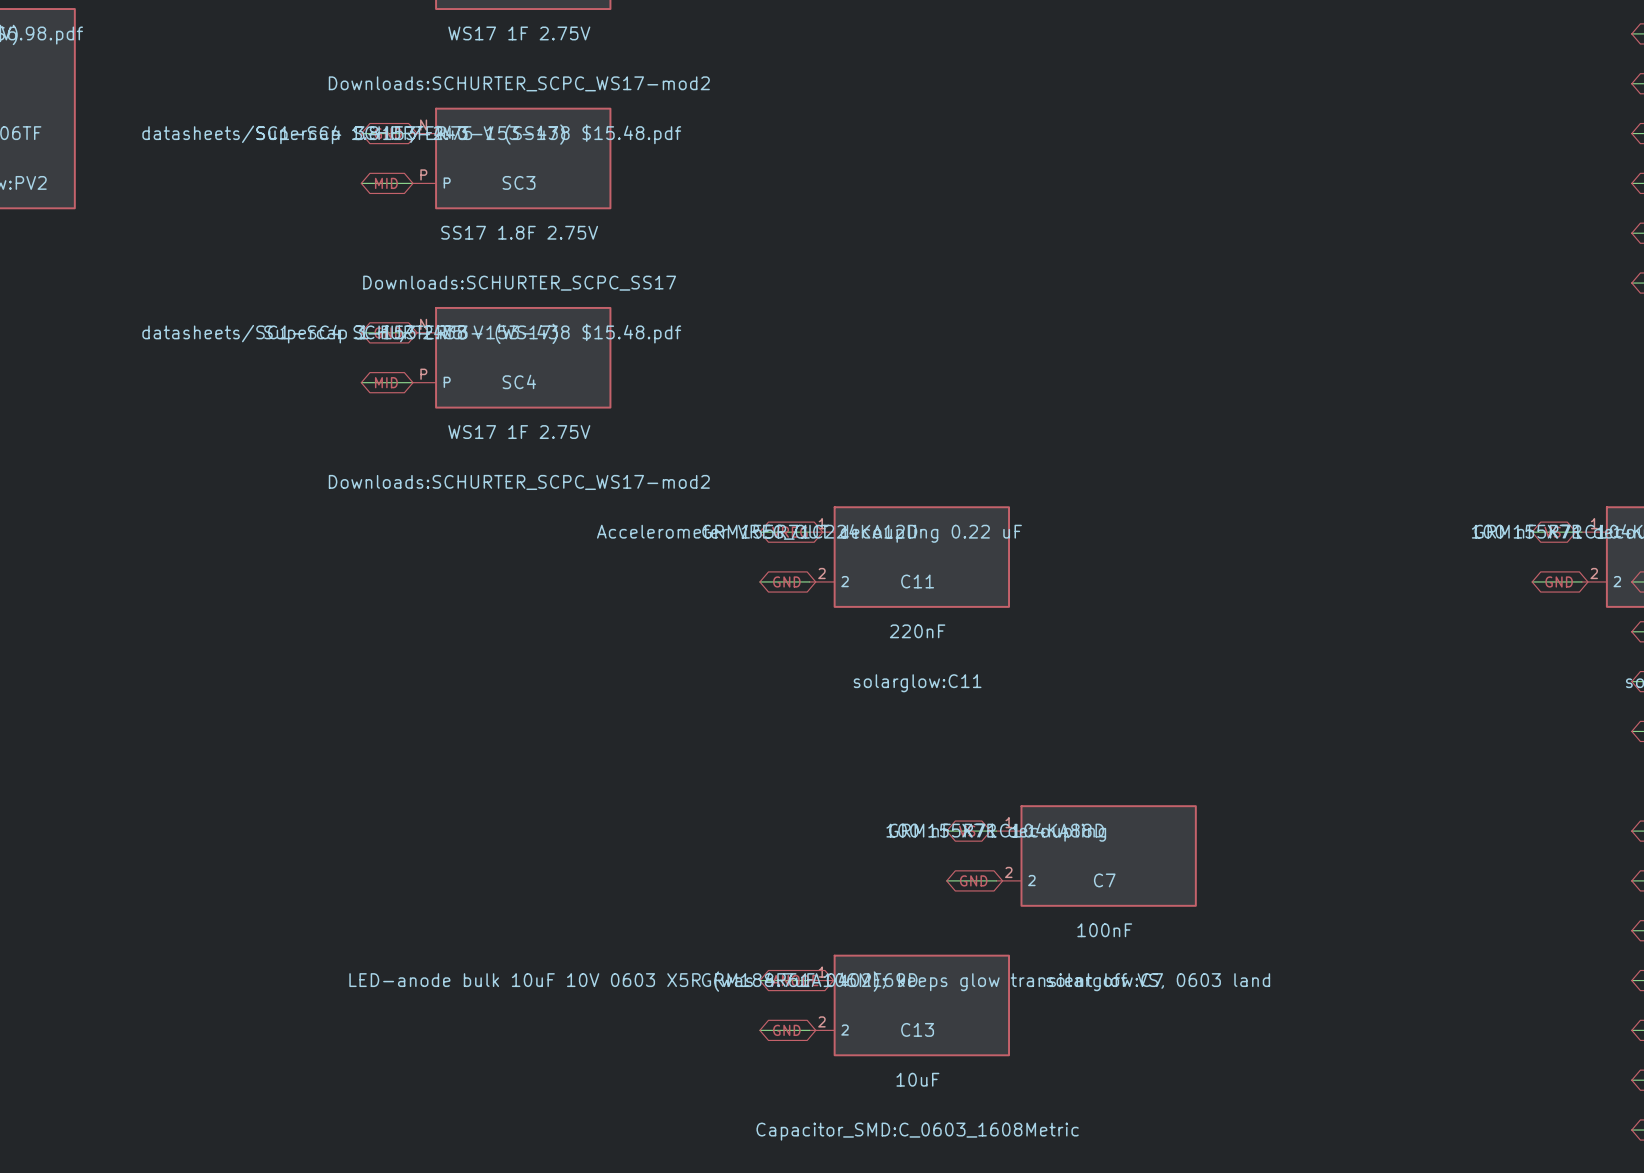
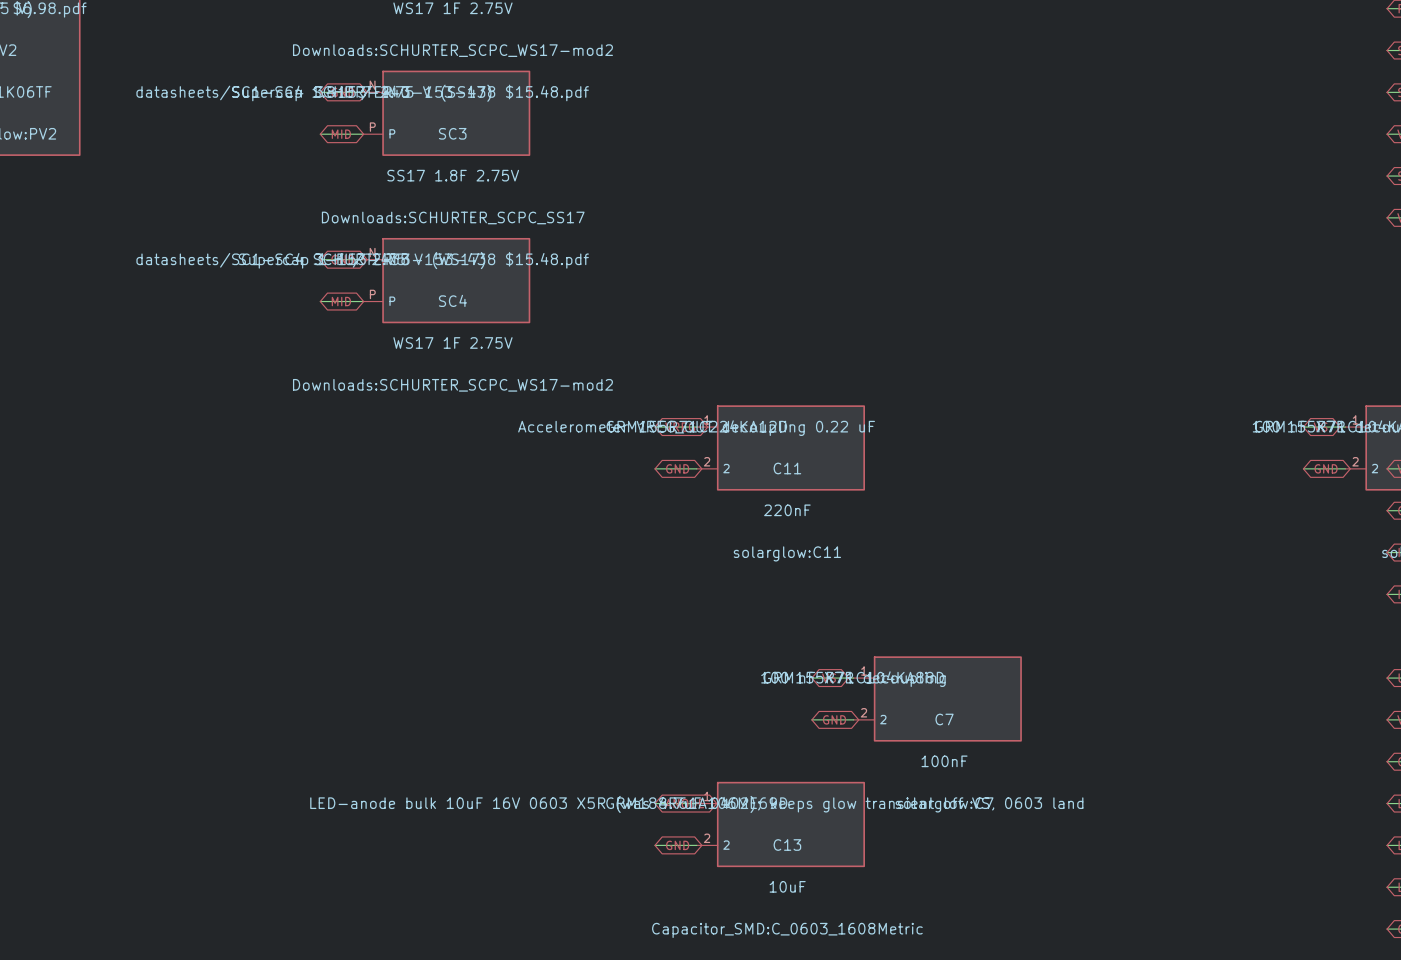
C13 text: LED-anode bulk 10uF 10V 0603 X5R (was 4.7uF 0402); keeps glow transient off VS, 0603 land (809, 981) -> LED-anode bulk 10uF 16V 0603 X5R (was 4.7uF 0402); keeps glow transient off VS, 0603 land (696, 804)

